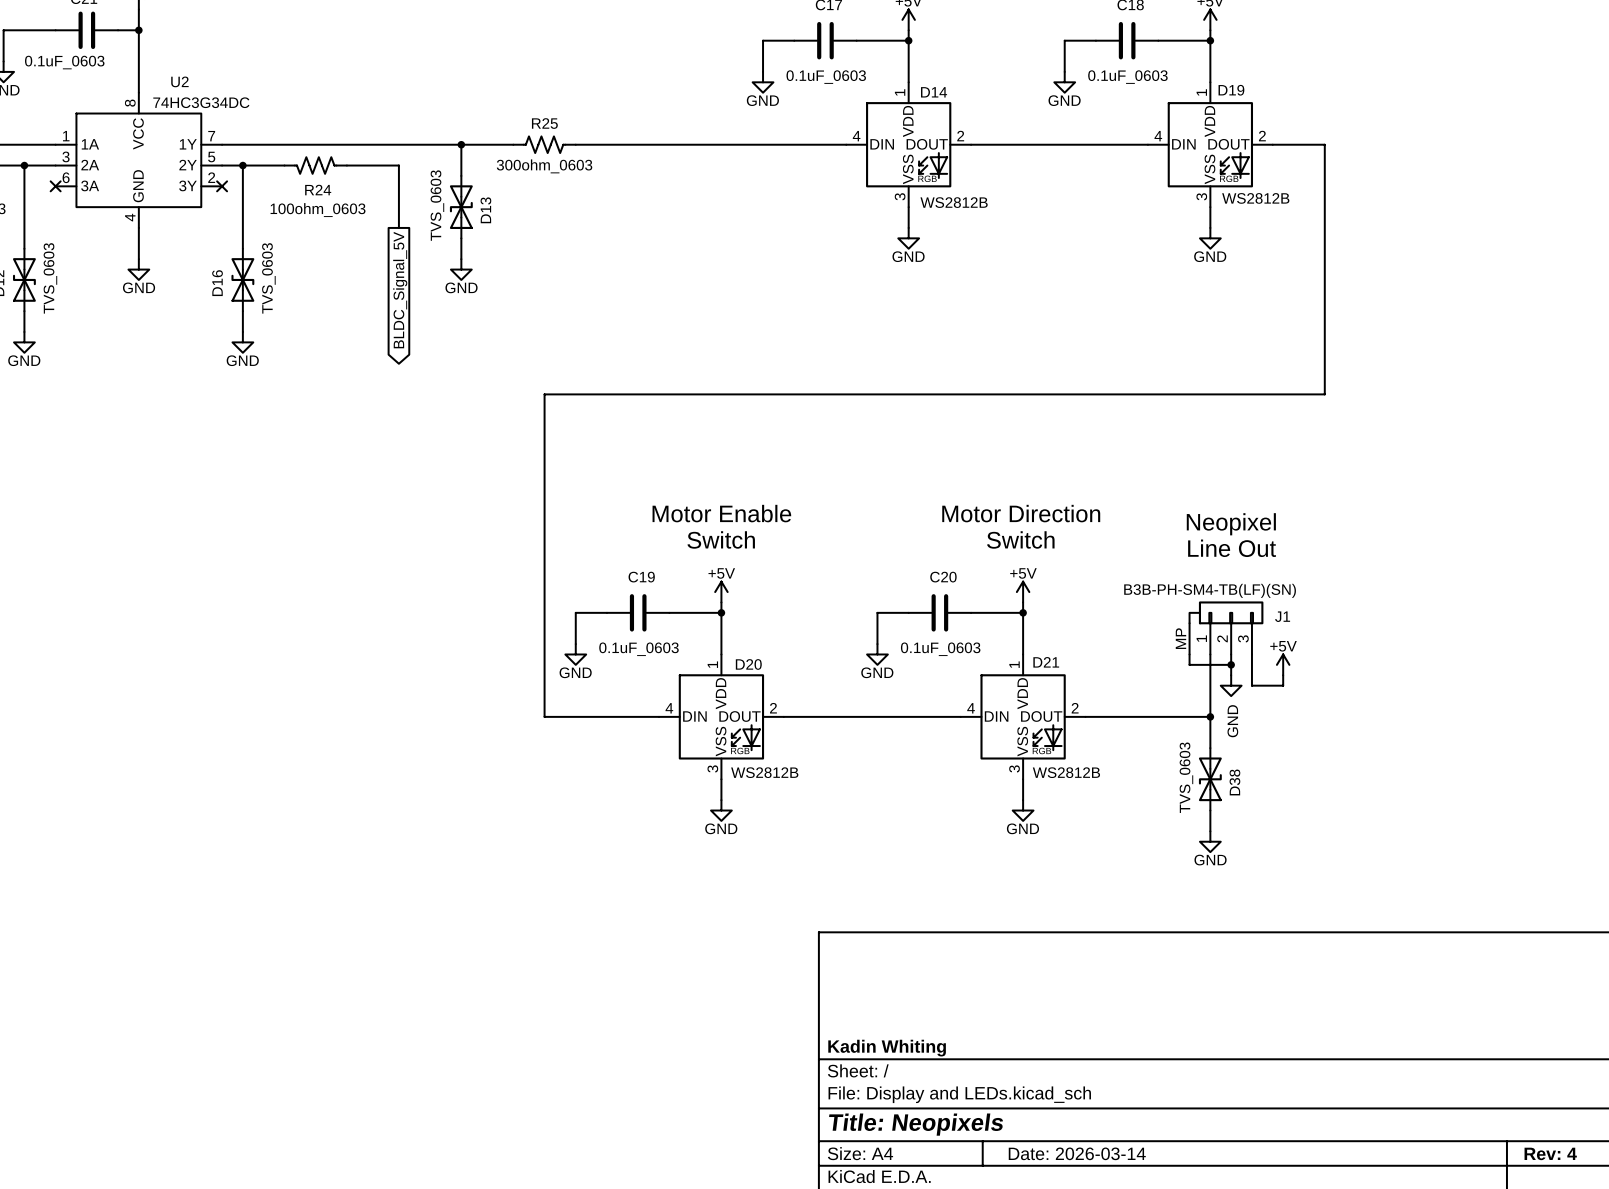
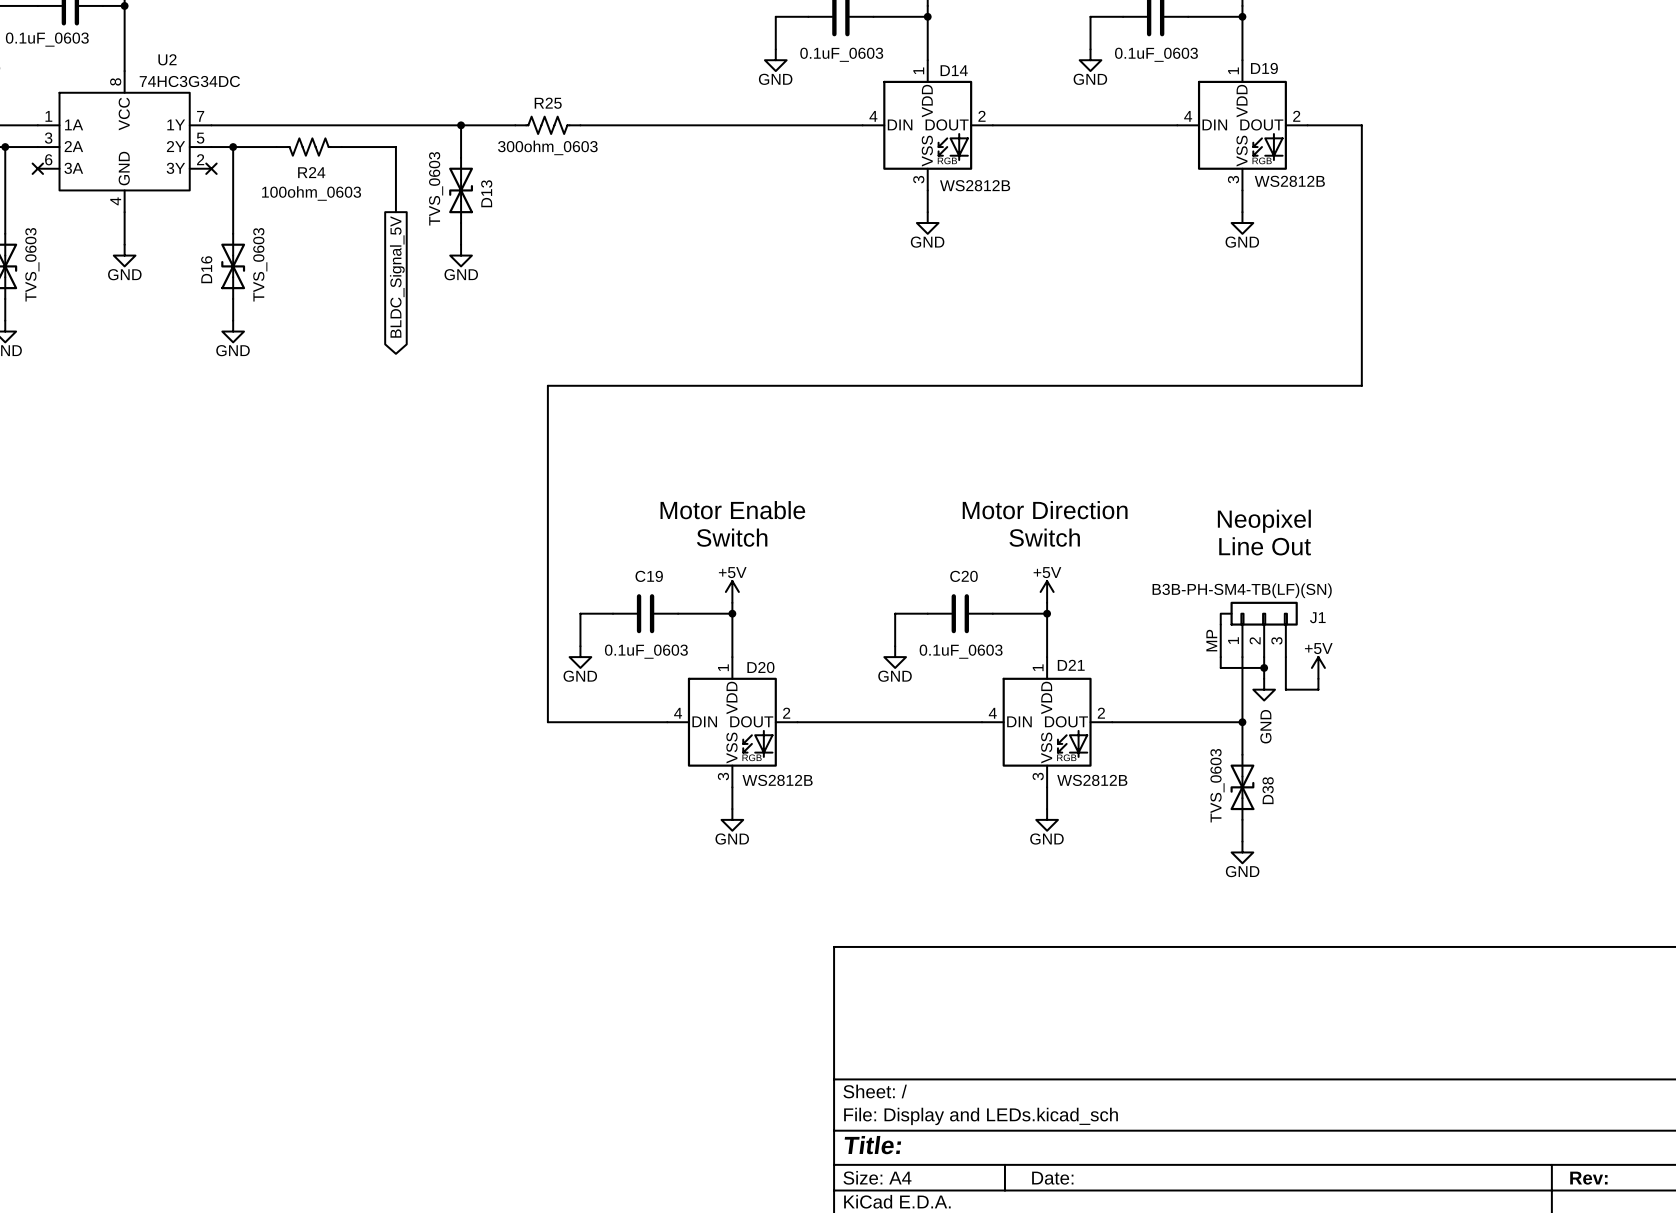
title block: Kadin Whiting (887, 1048) -> none
title block: Title: Neopixels (916, 1124) -> Title: (872, 1145)
title block: Date: 2026-03-14 (1077, 1153) -> Date: (1052, 1178)
title block: Rev: 4 (1550, 1153) -> Rev: (1588, 1178)

